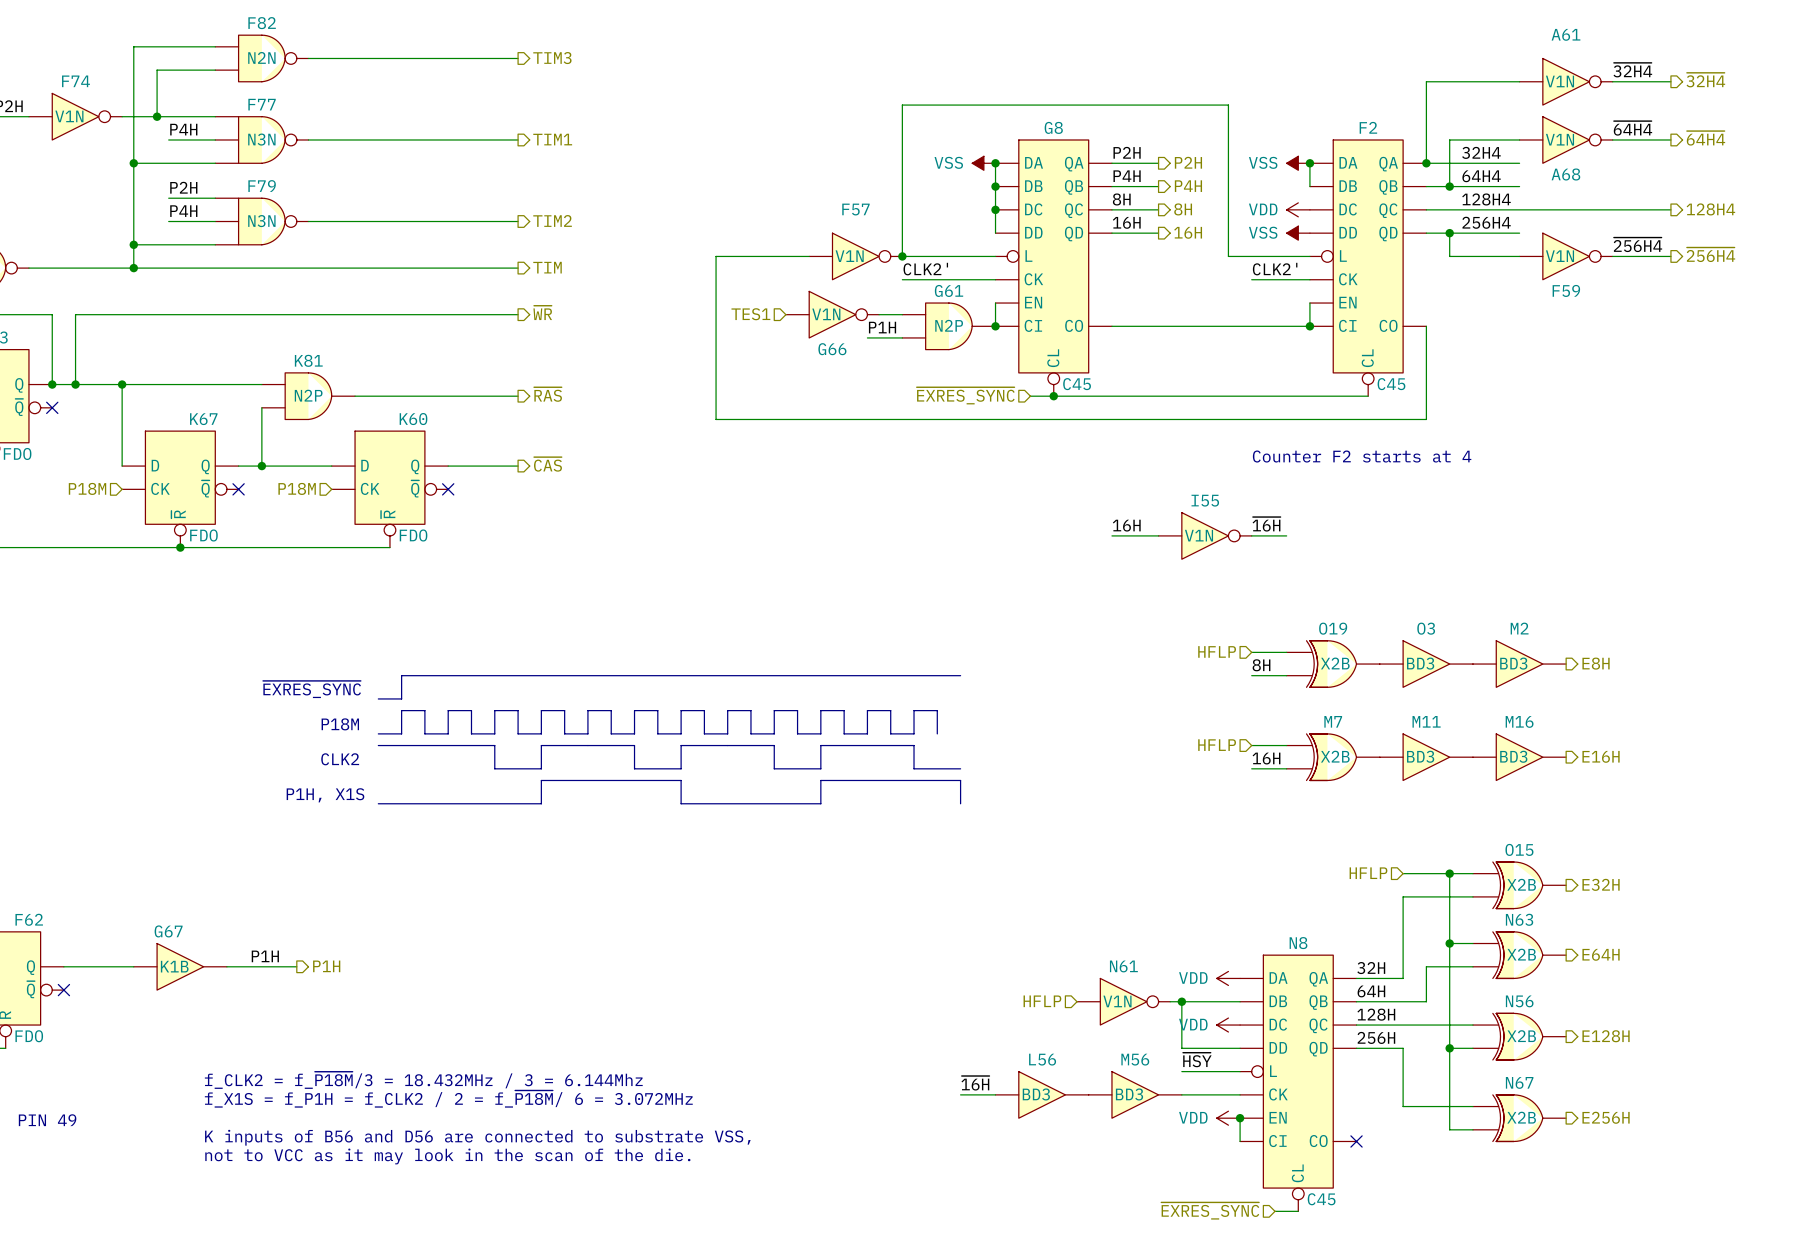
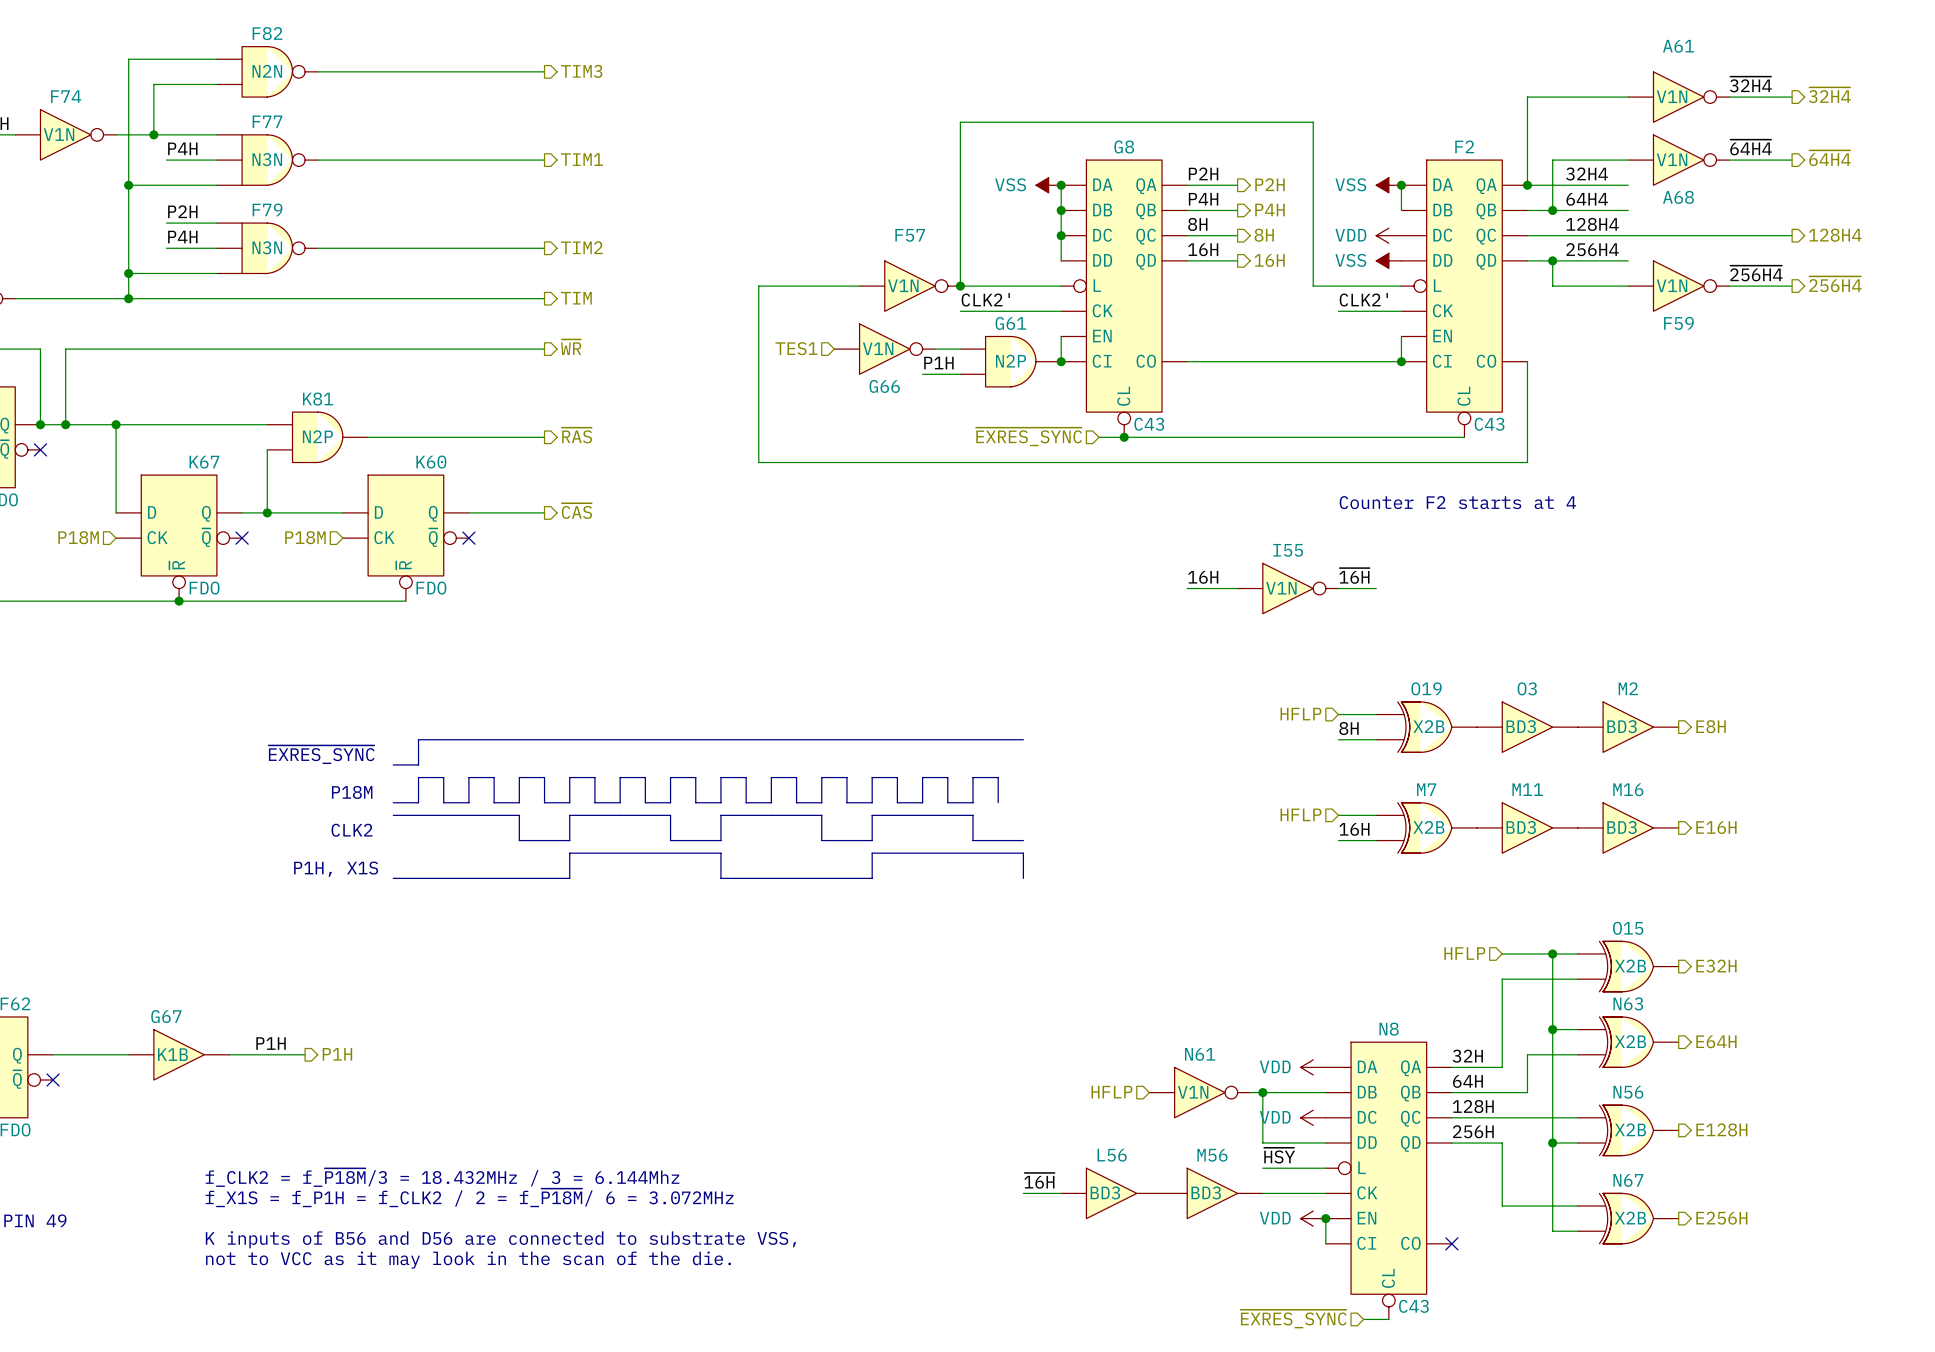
G8 value: C45 (1077, 384) -> C43 (1149, 424)
F2 value: C45 (1391, 384) -> C43 (1489, 424)
N8 value: C45 (1321, 1199) -> C43 (1413, 1306)

